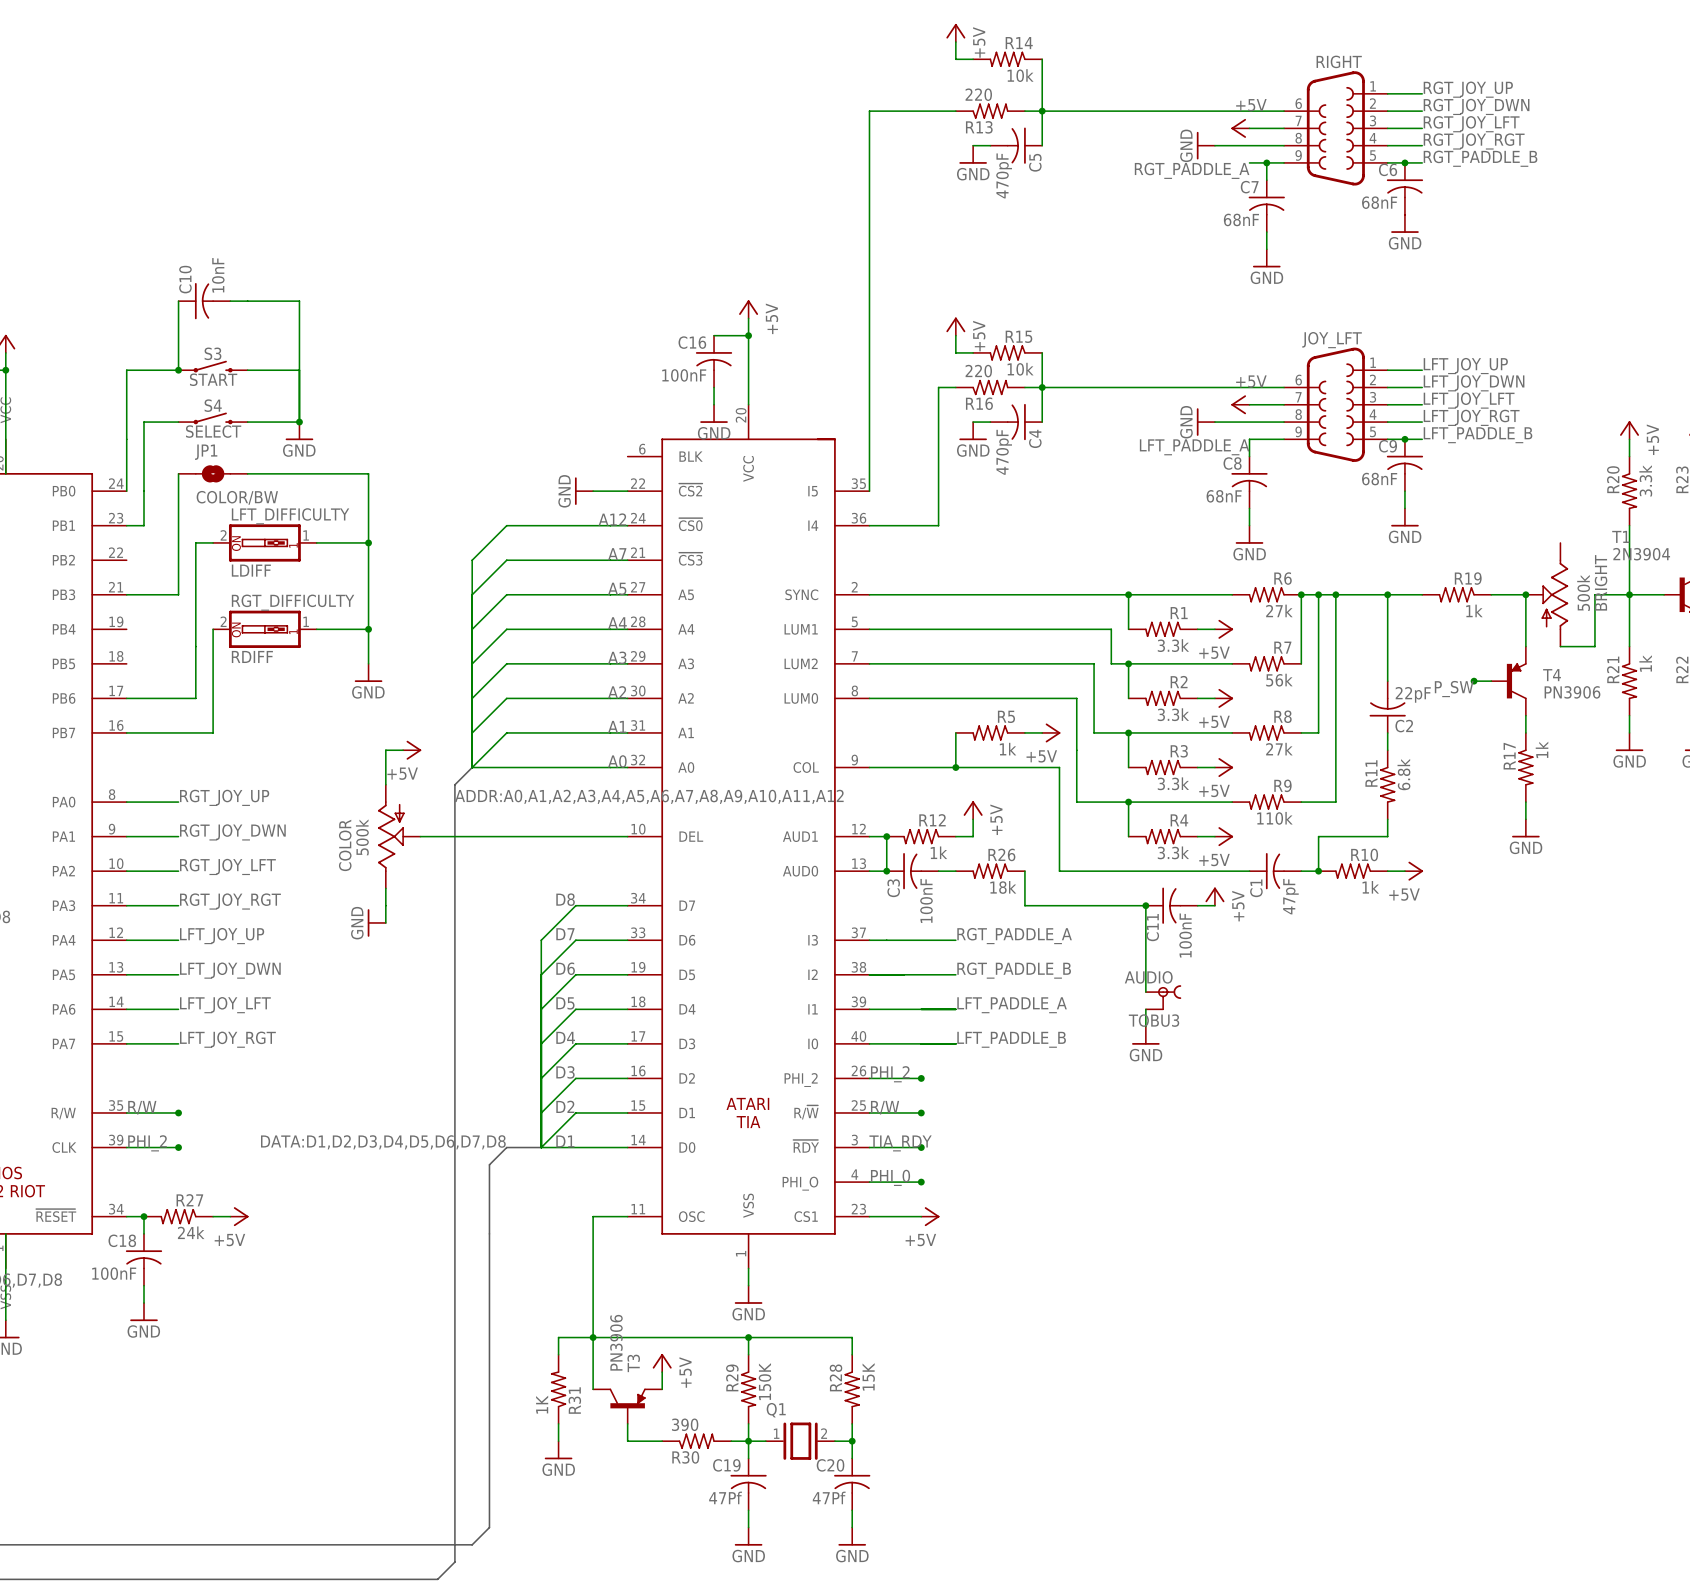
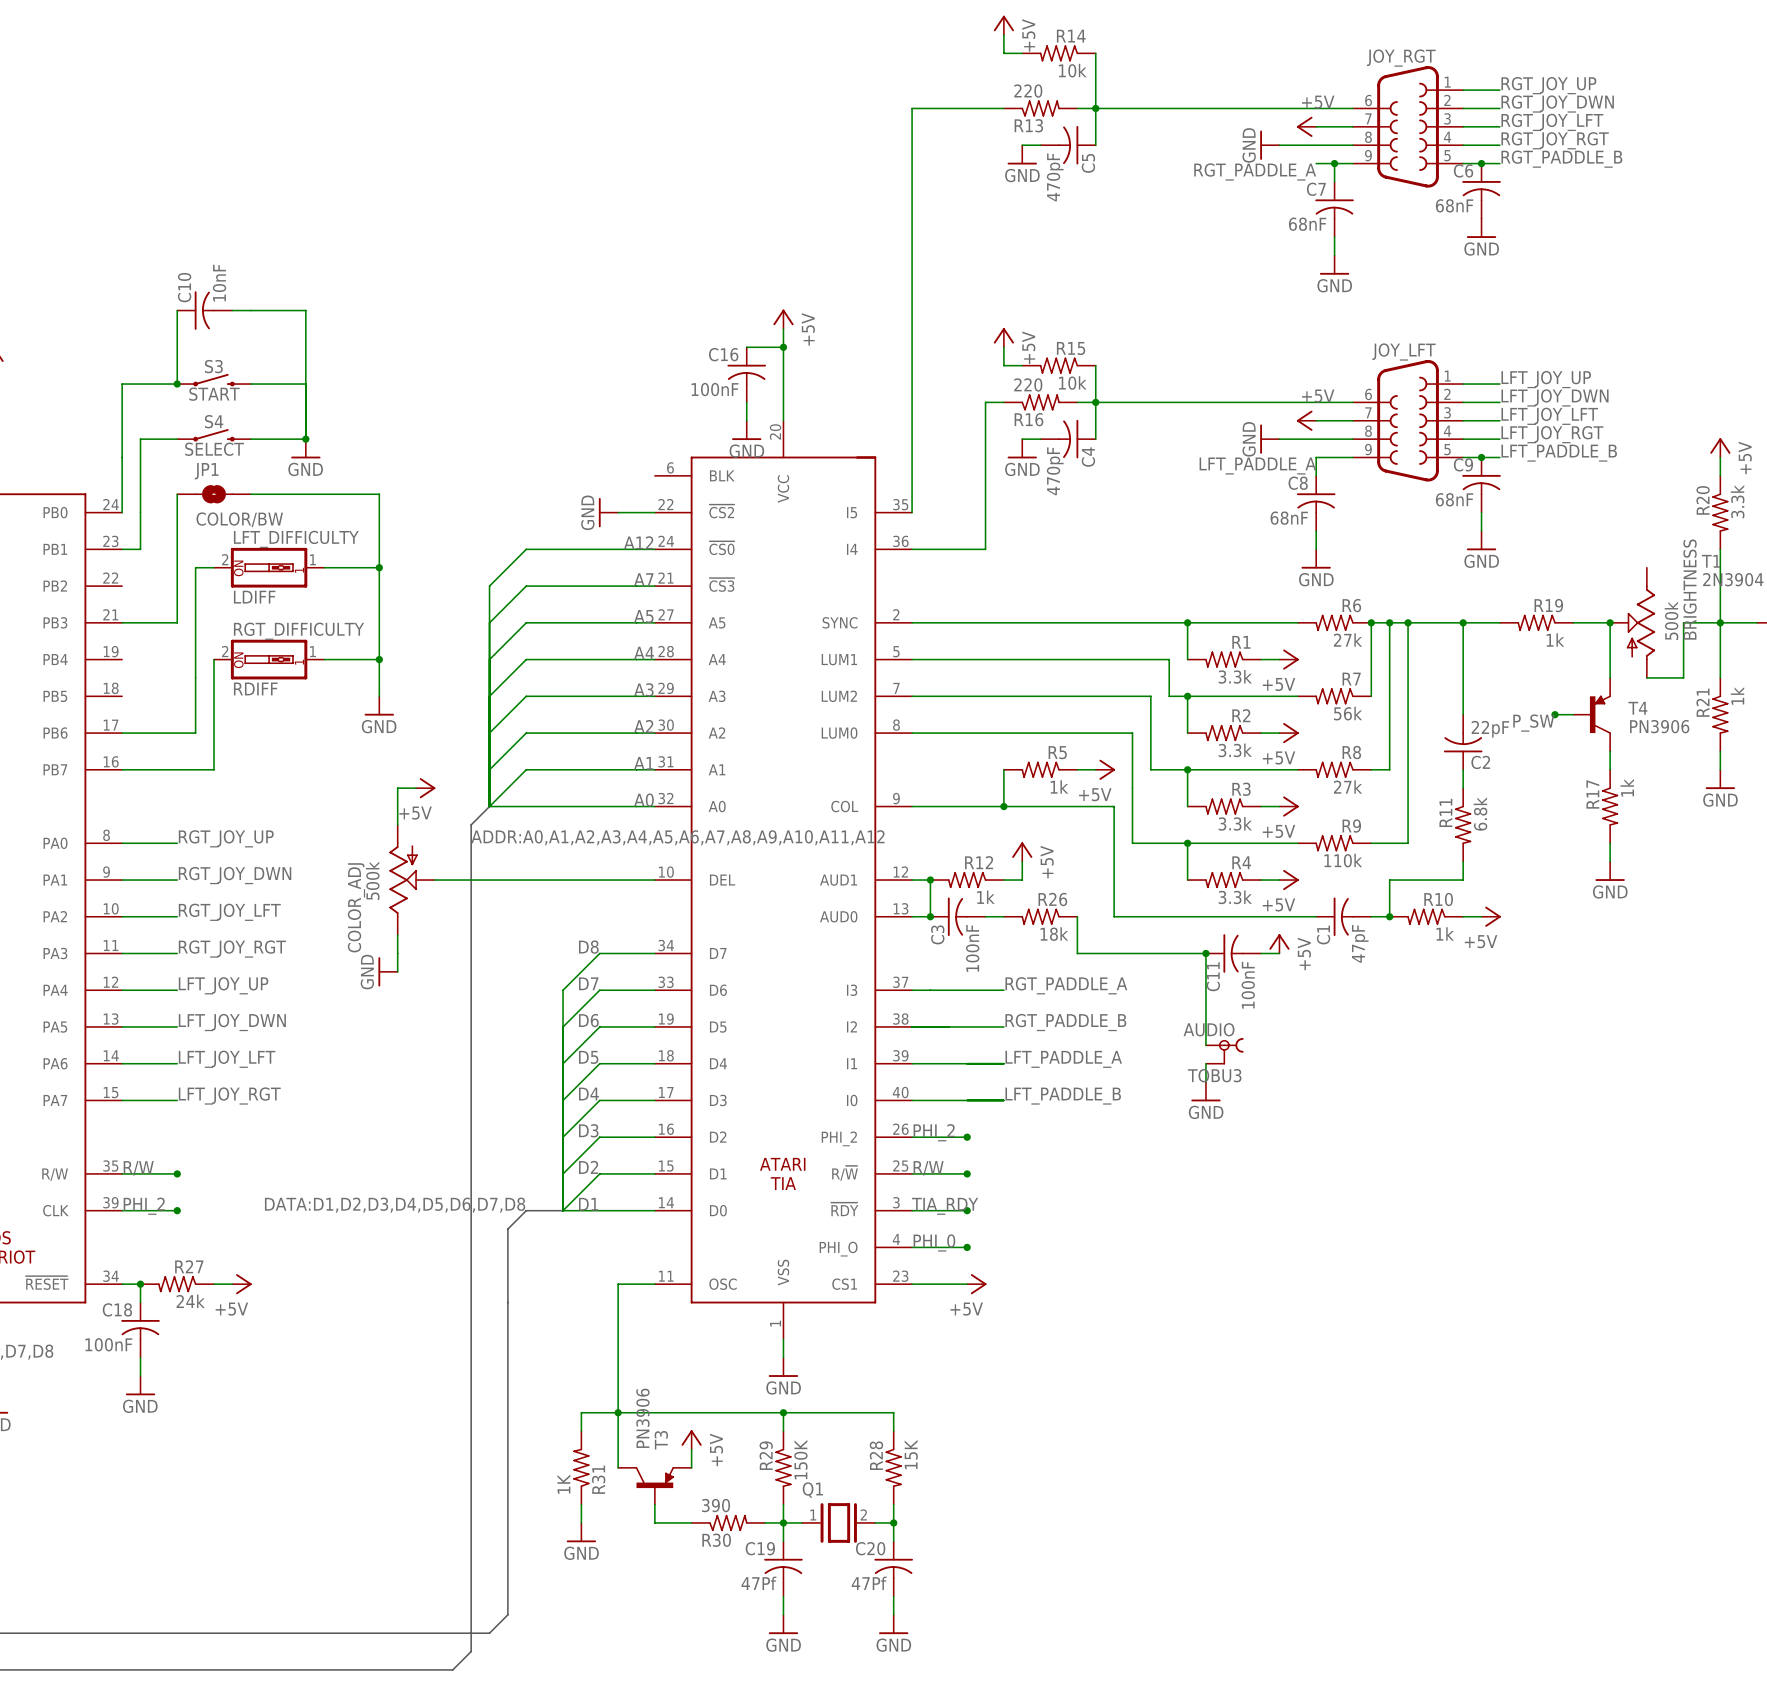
RIGHT name: RIGHT (1339, 61) -> JOY_RGT (1401, 58)
BRIGHT name: BRIGHT (1601, 582) -> BRIGHTNESS (1690, 589)
COLOR name: COLOR (345, 845) -> COLOR_ADJ (356, 907)

